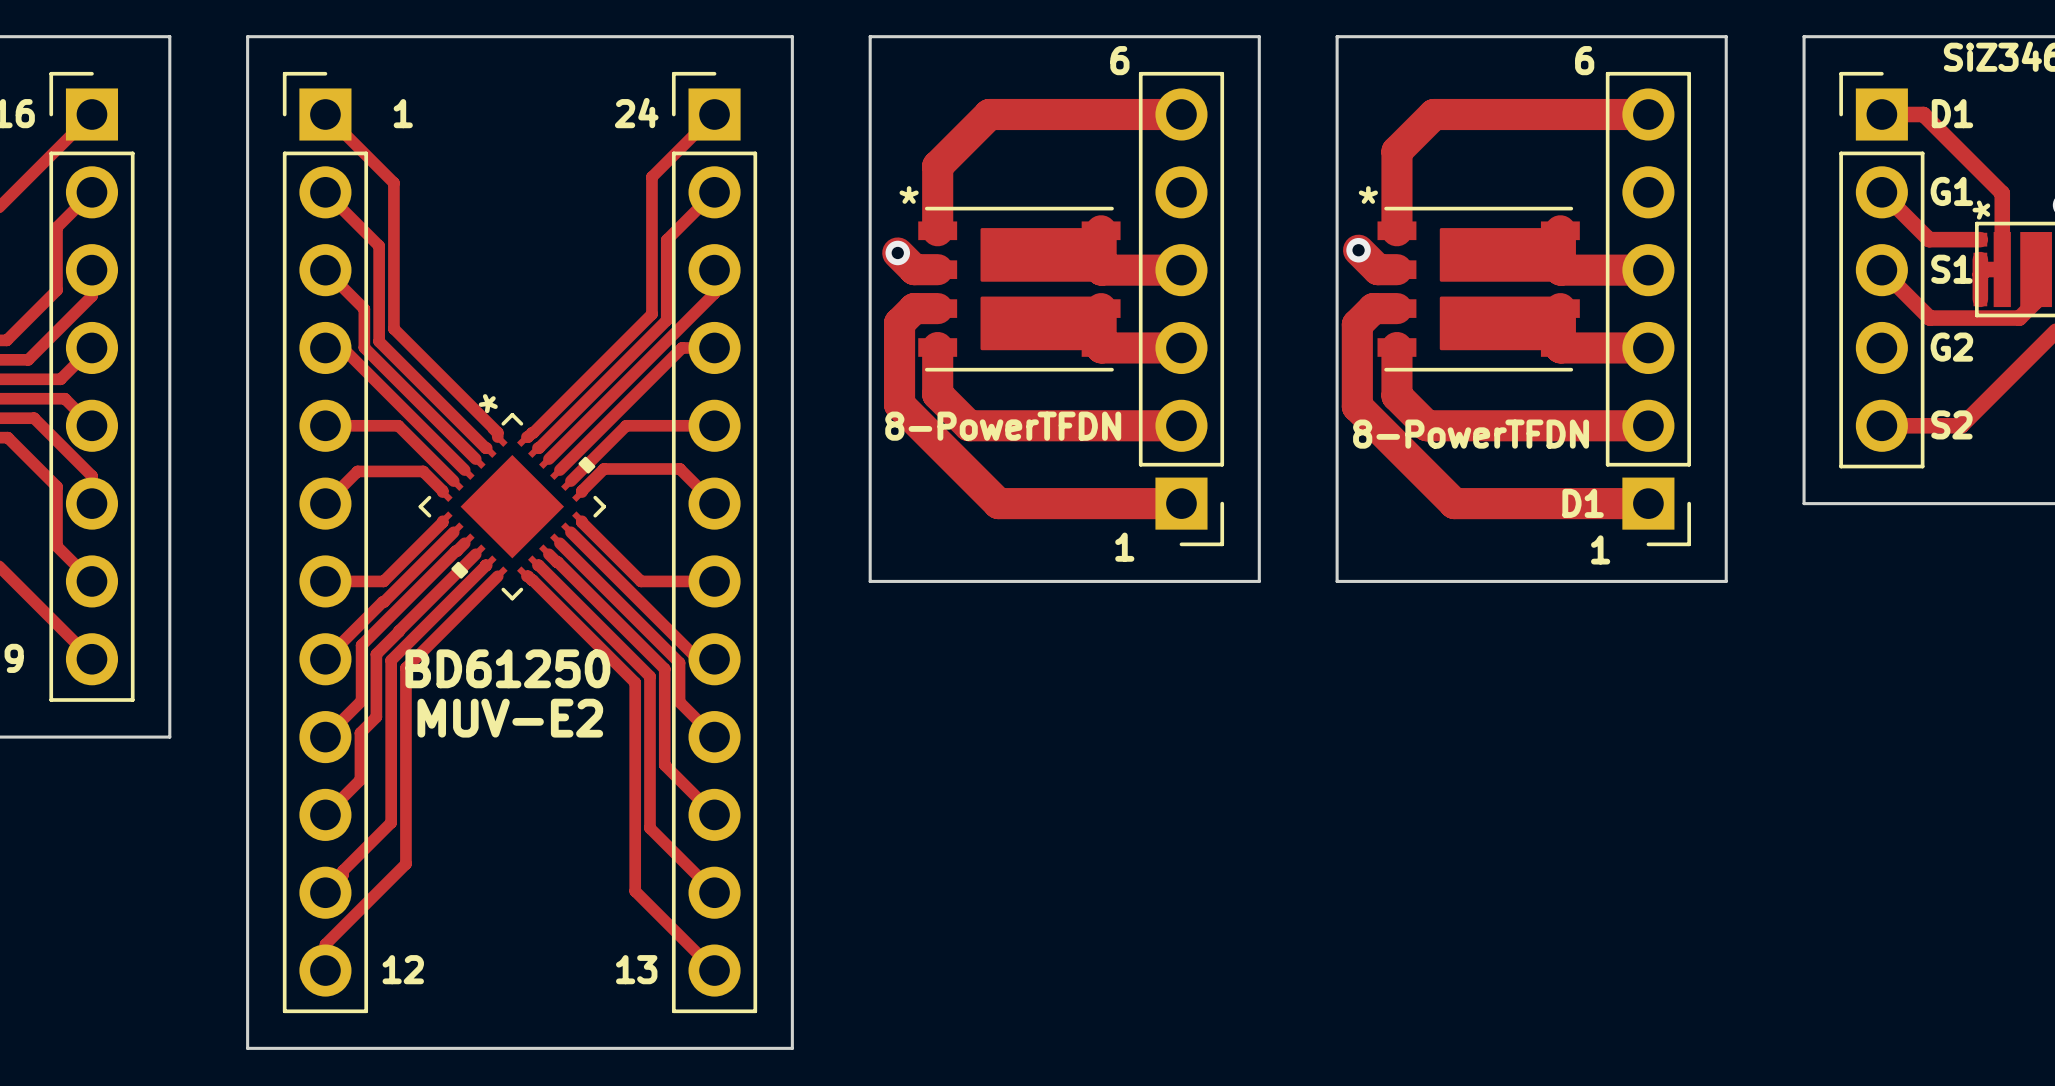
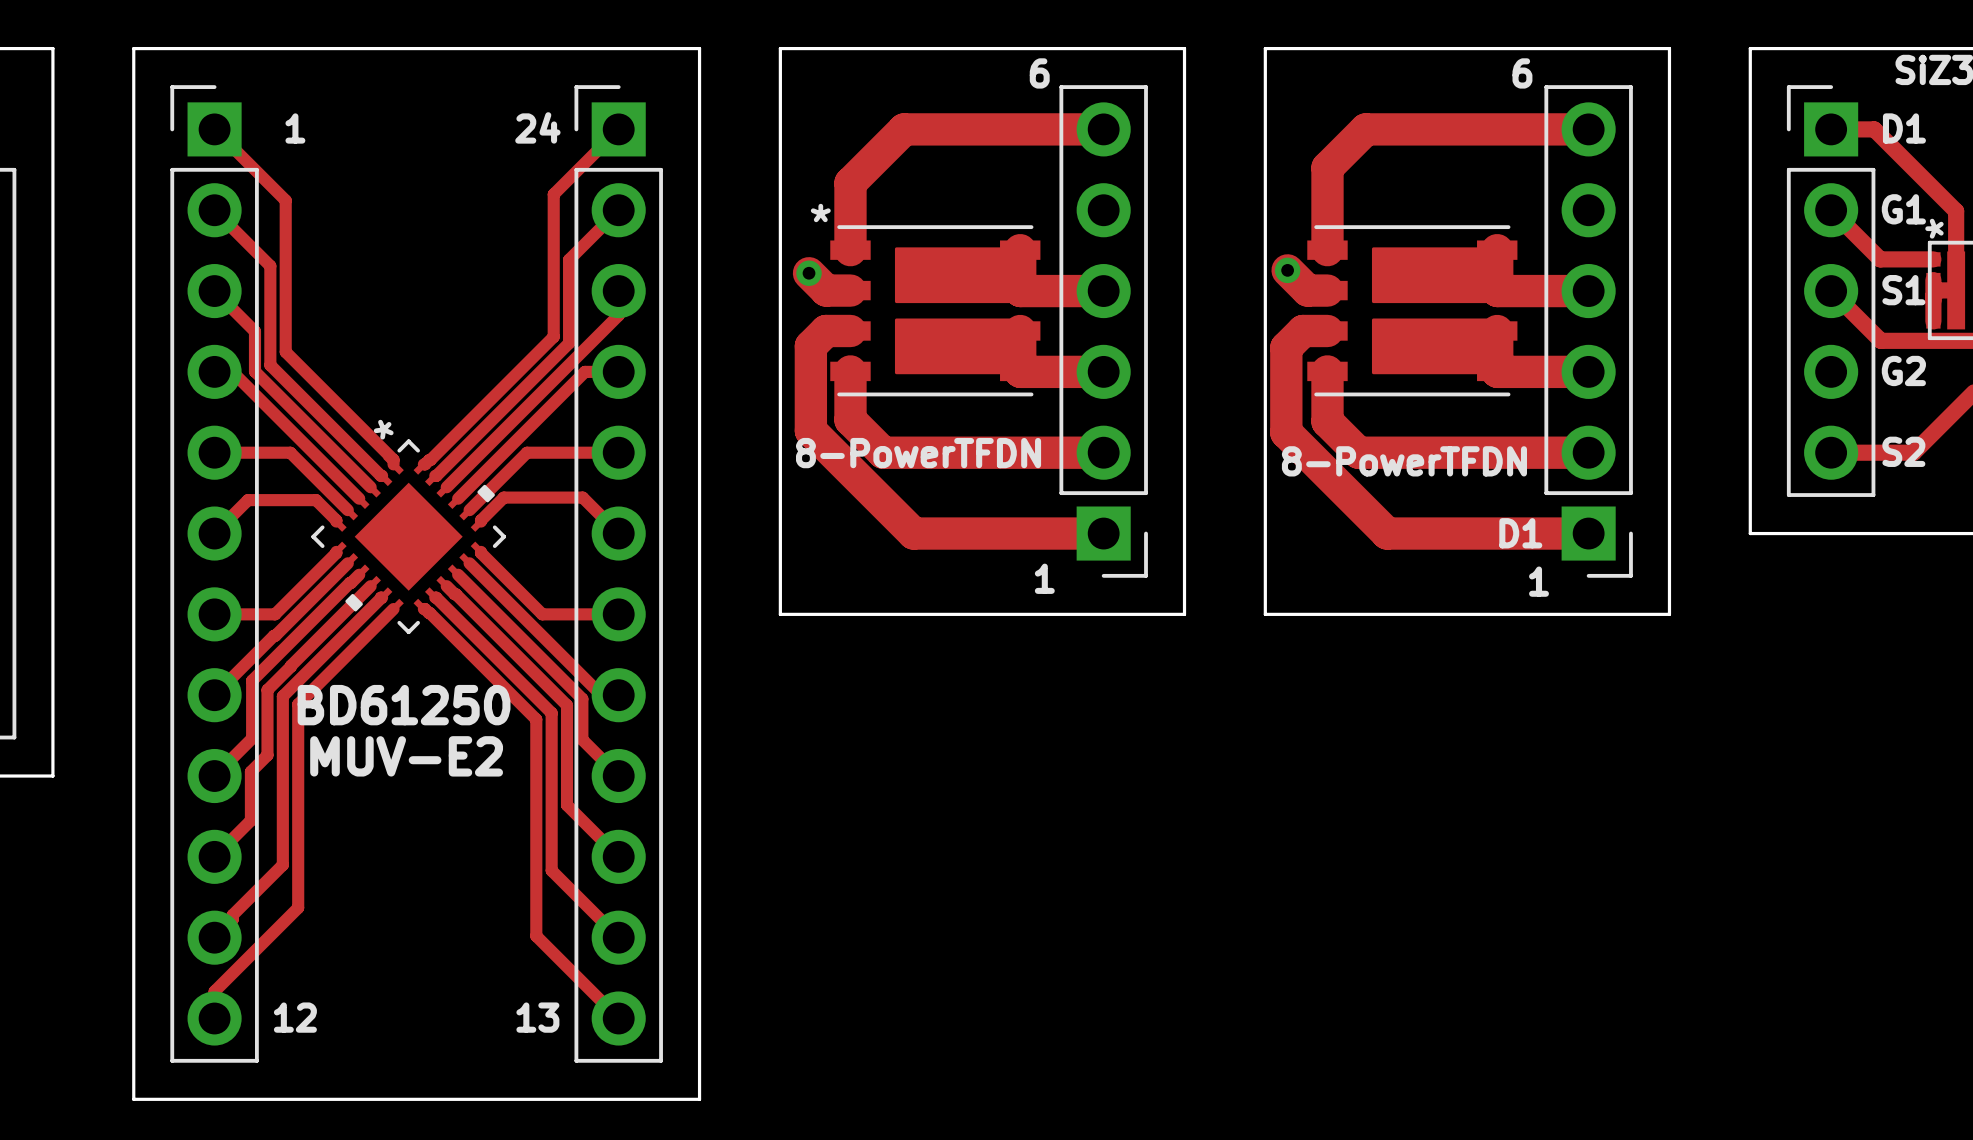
part text: * (1368, 194) -> none
part footprint: [418, 412, 607, 601] -> [311, 439, 507, 635]

